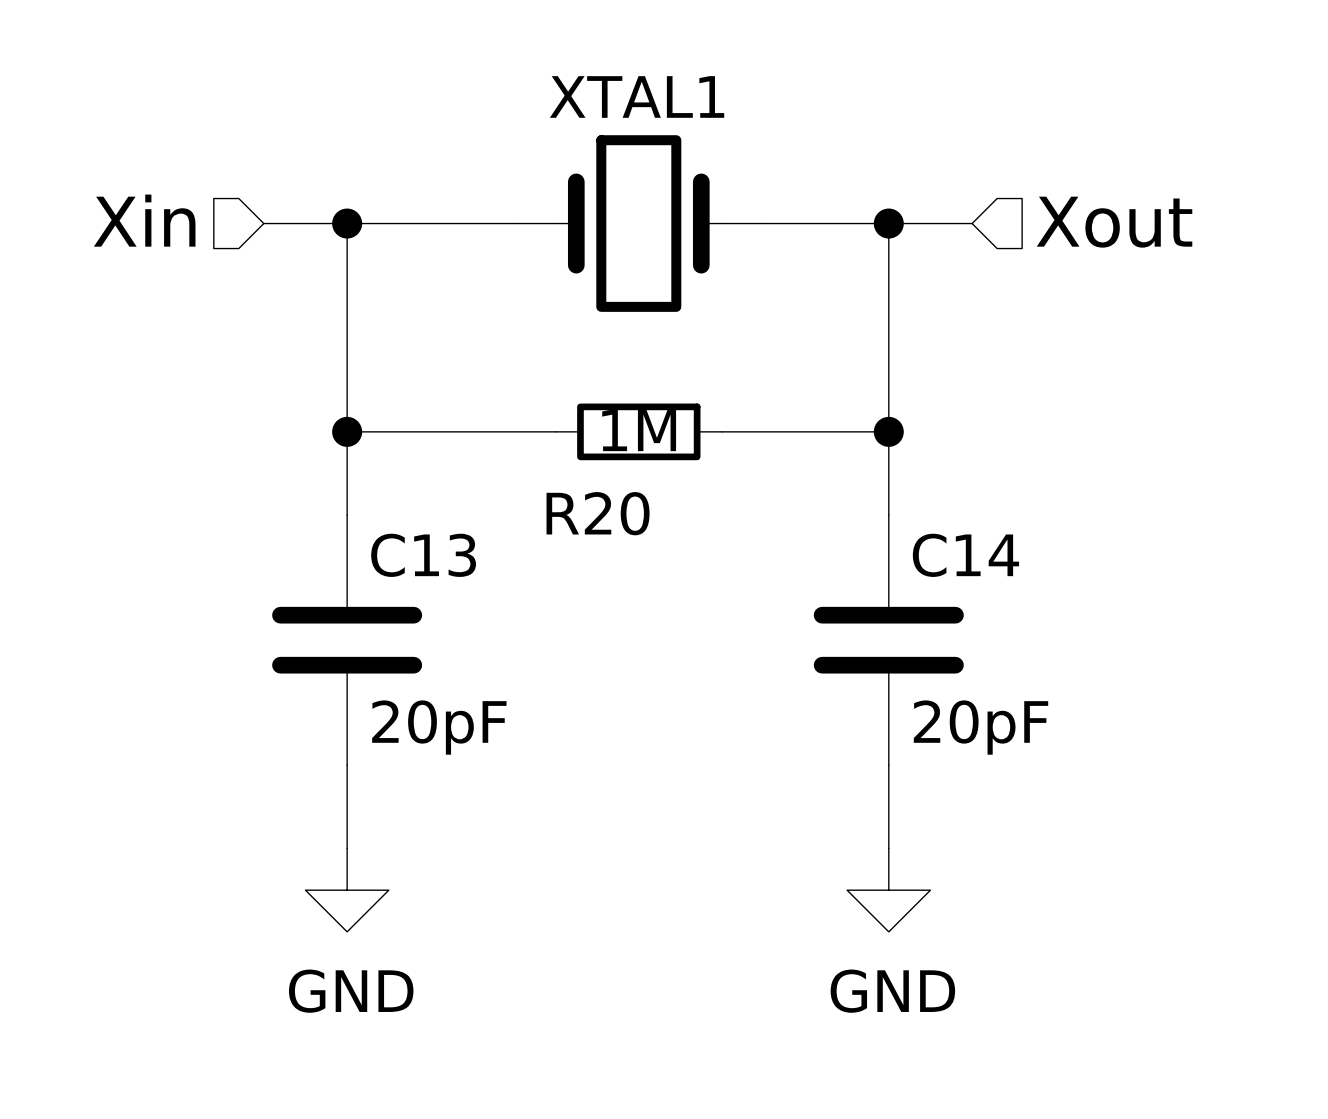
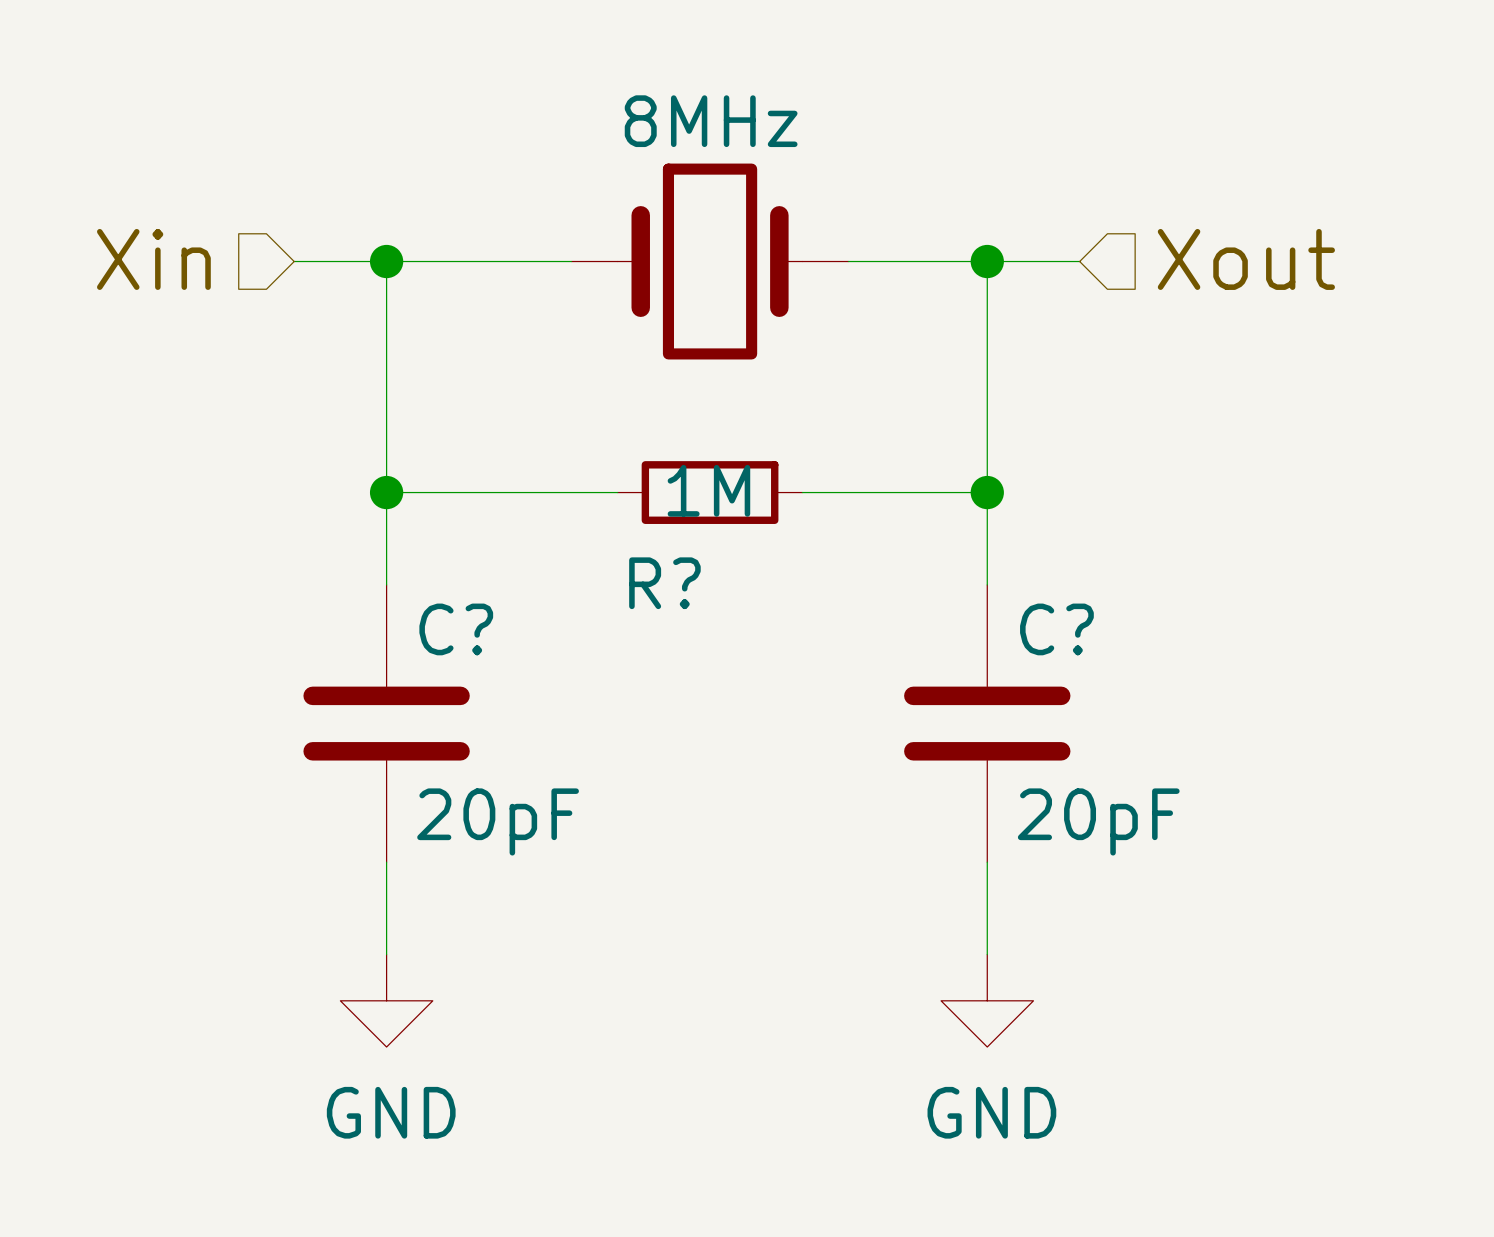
XTAL1 name: XTAL1 (637, 96) -> 8MHz (711, 121)
R20 name: R20 (598, 513) -> R? (664, 583)
C13 name: C13 (423, 555) -> C? (456, 629)
C14 name: C14 (965, 555) -> C? (1056, 629)

